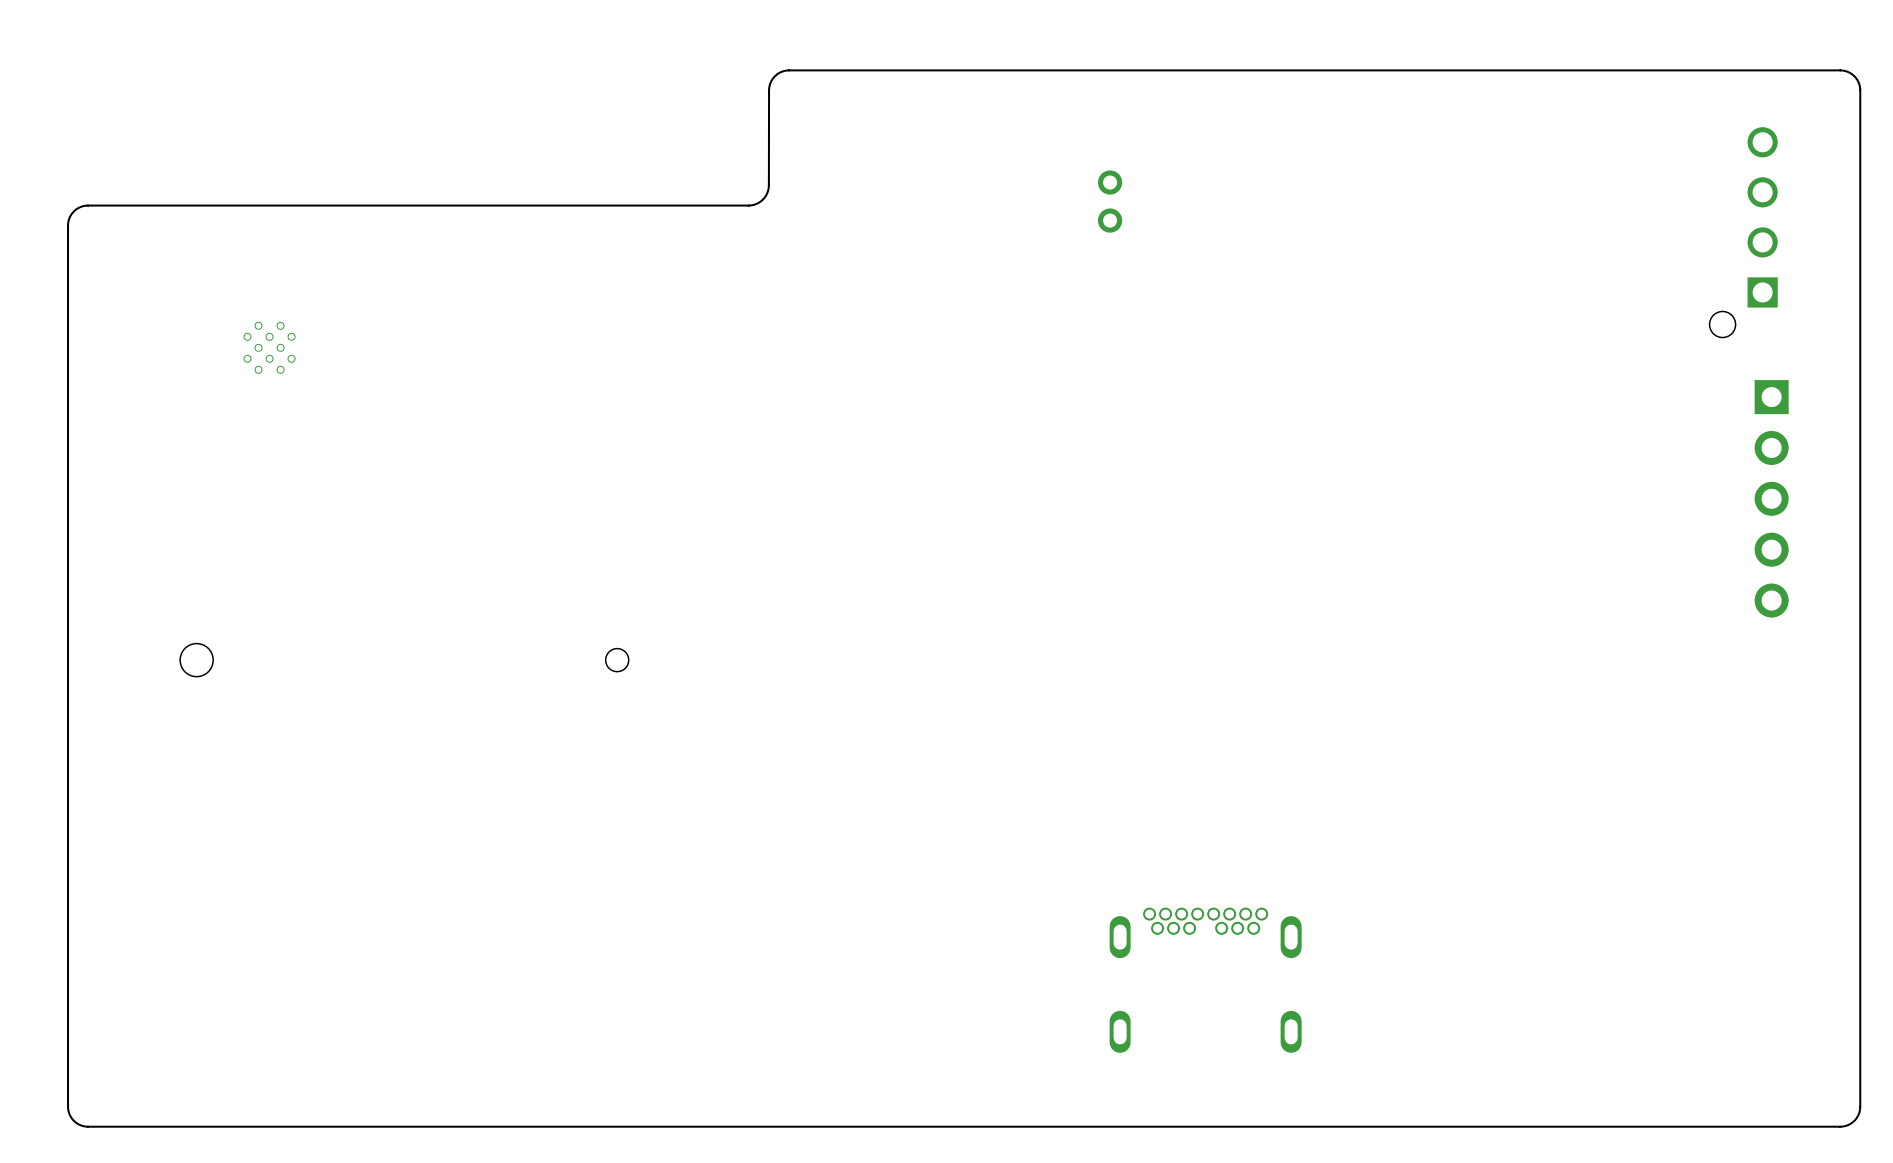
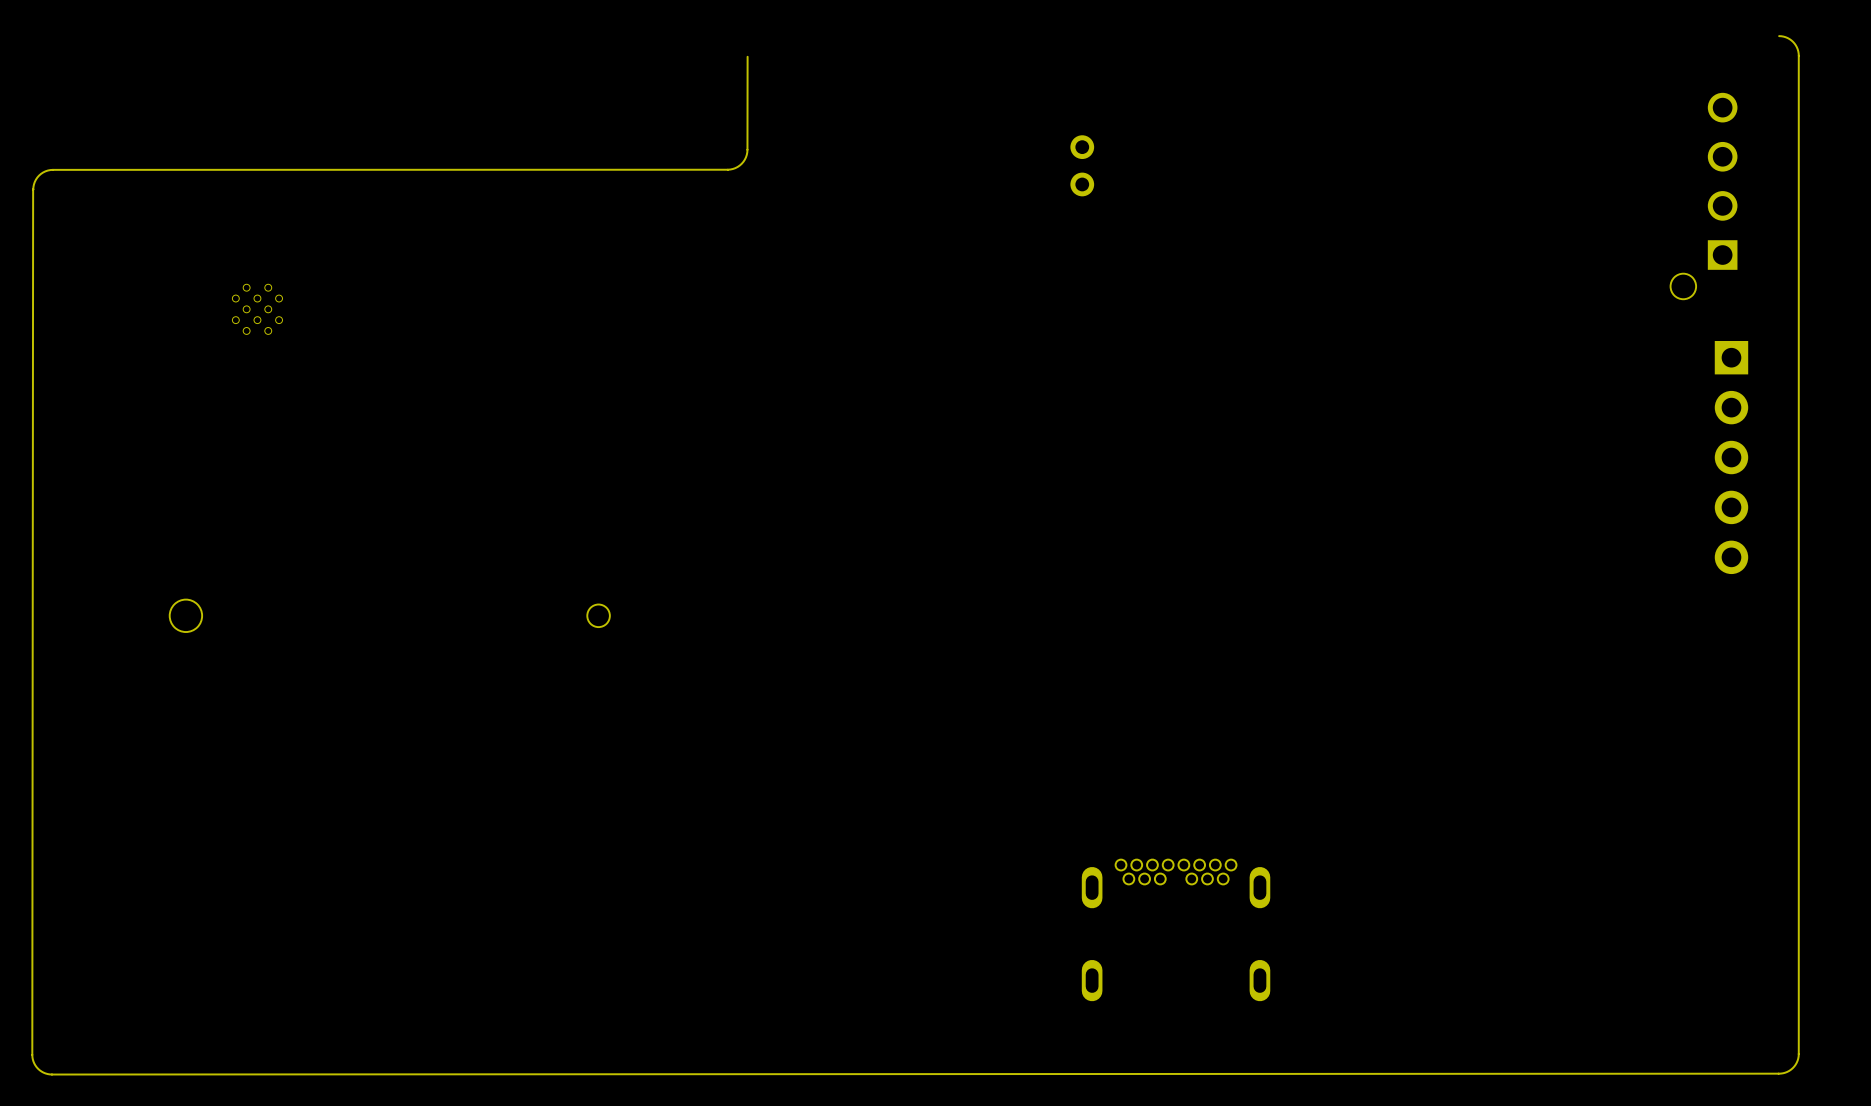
board edge: none -> (1779, 36) (1793, 41) (1798, 55) (1798, 1054) (1796, 1062) (1792, 1068) (1780, 1073) (51, 1074) (43, 1072) (35, 1065) (32, 1054) (33, 189)
board edge: (769, 90) (774, 76) (789, 70) (1840, 70) (1854, 76) (1860, 90) (1860, 1106) (1855, 1119) (1848, 1124) (1840, 1126) (88, 1126) (75, 1122) (70, 1115) (68, 1106) (68, 225) (72, 213) (79, 207) (88, 205) (748, 205) (756, 203) (763, 199) (767, 192) (768, 185) -> (33, 189) (39, 175) (52, 169) (727, 169) (741, 163) (747, 149)

